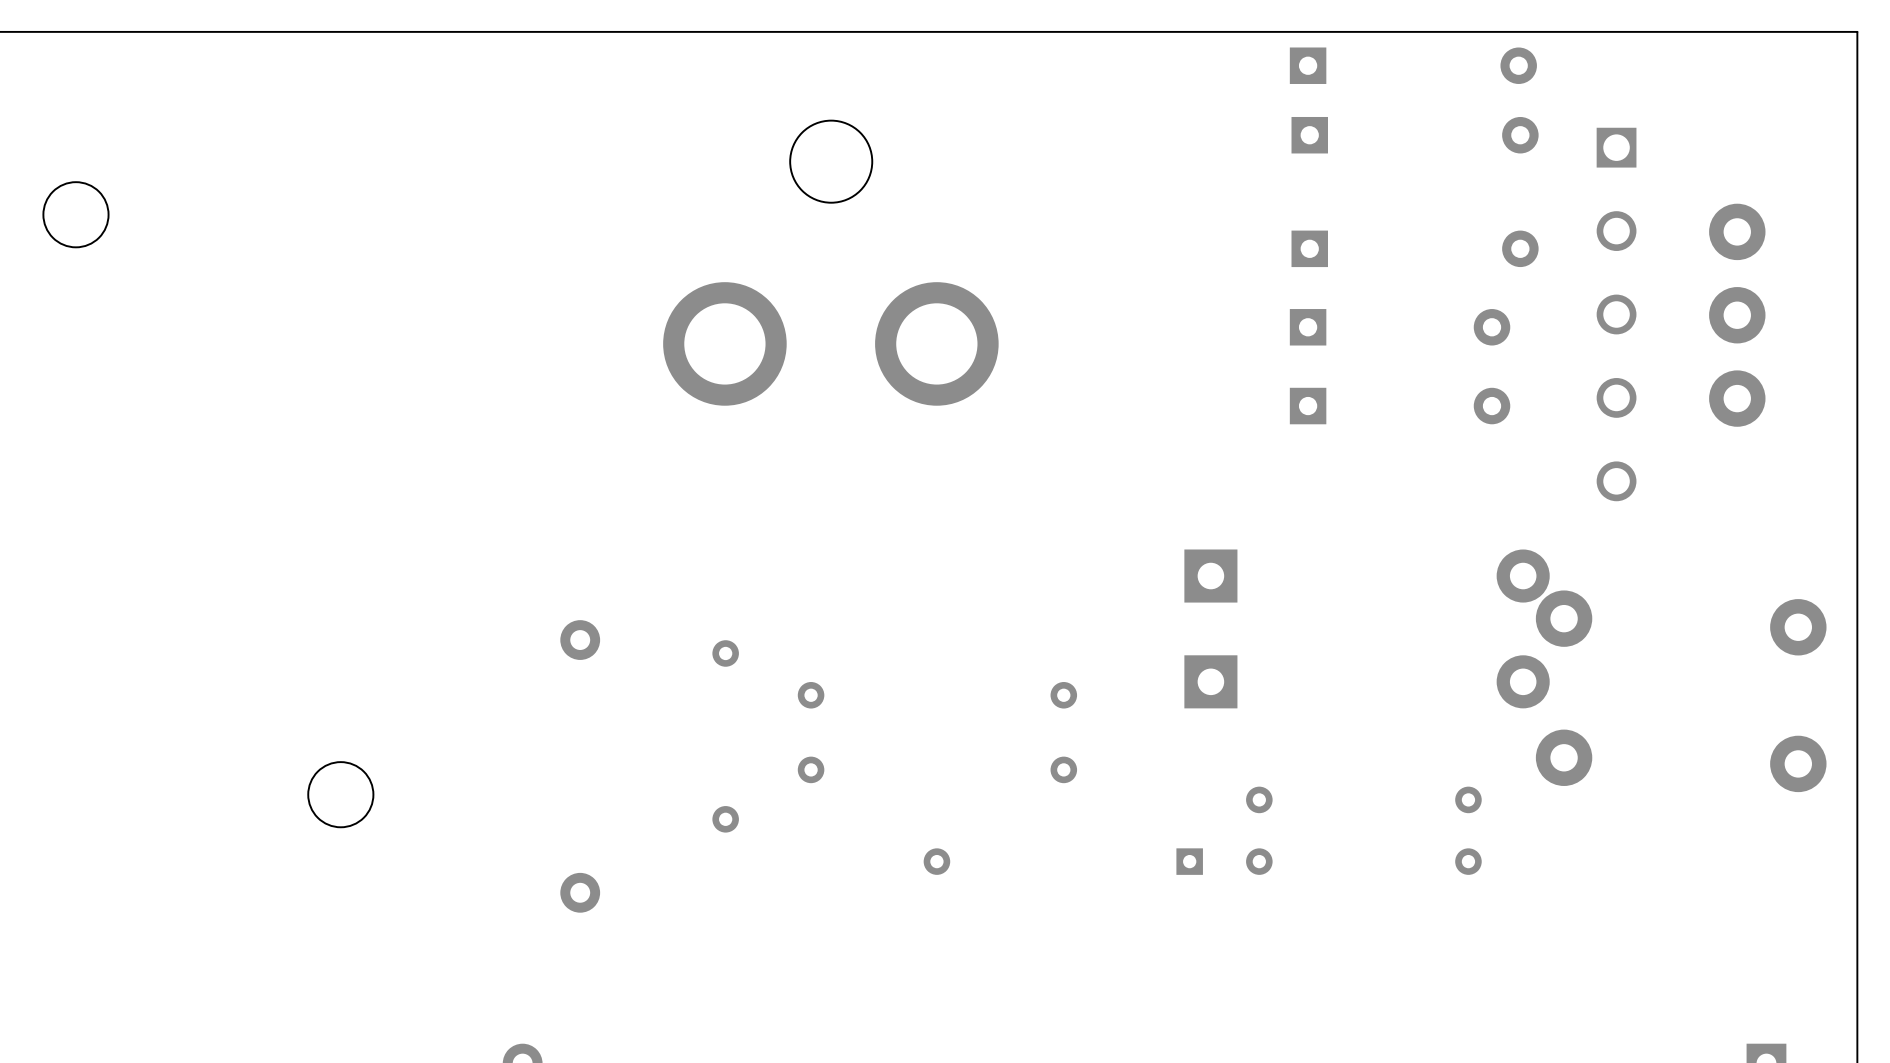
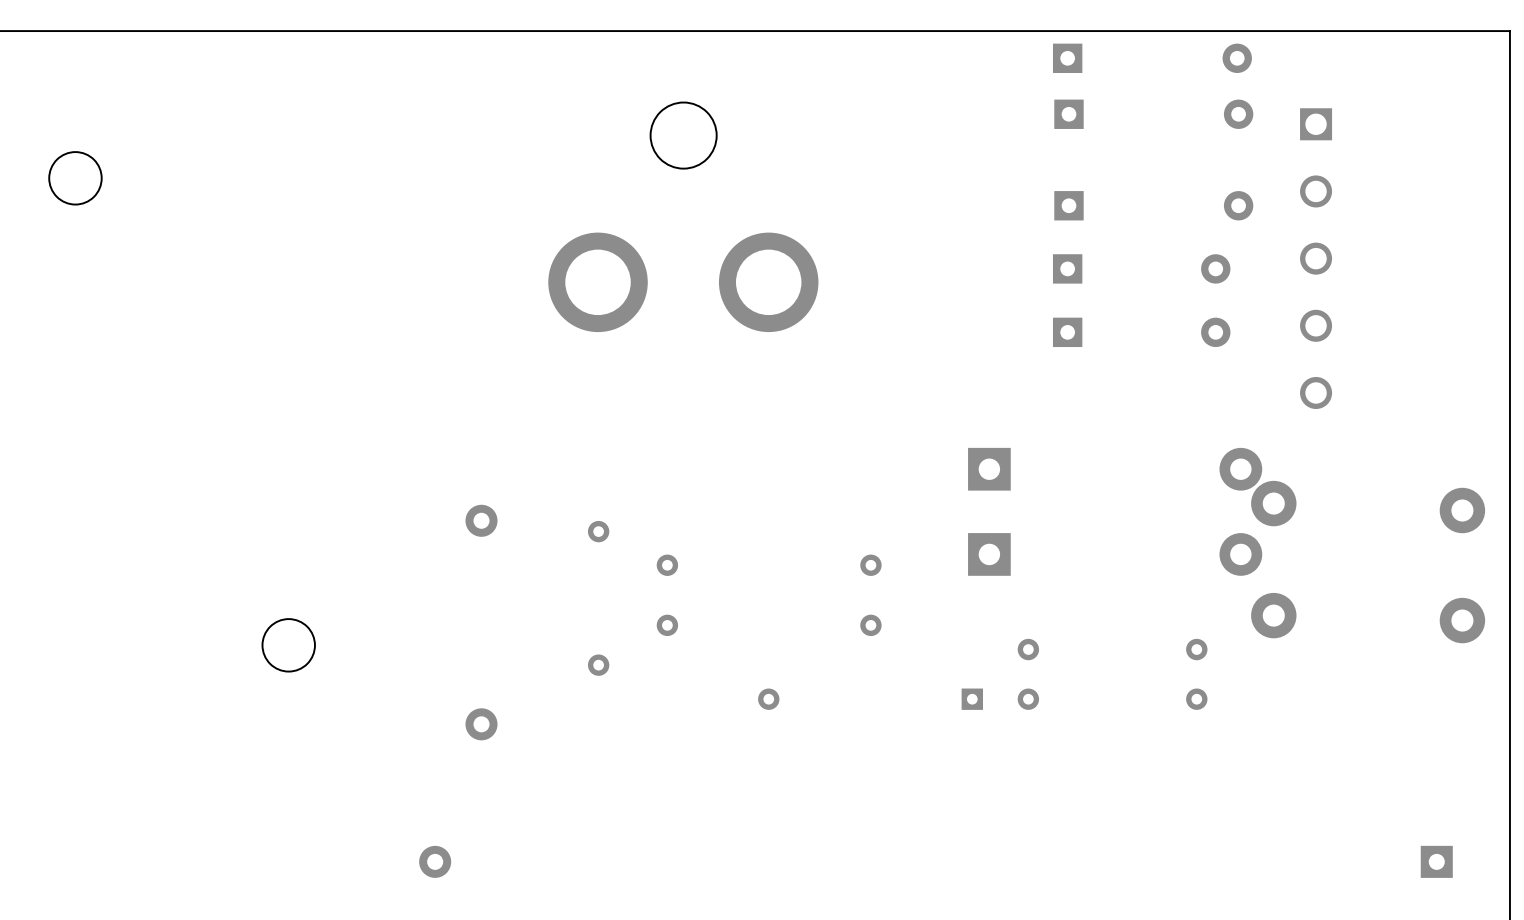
part: (1737, 231) -> none
part: (1737, 315) -> none
part: (1737, 398) -> none

